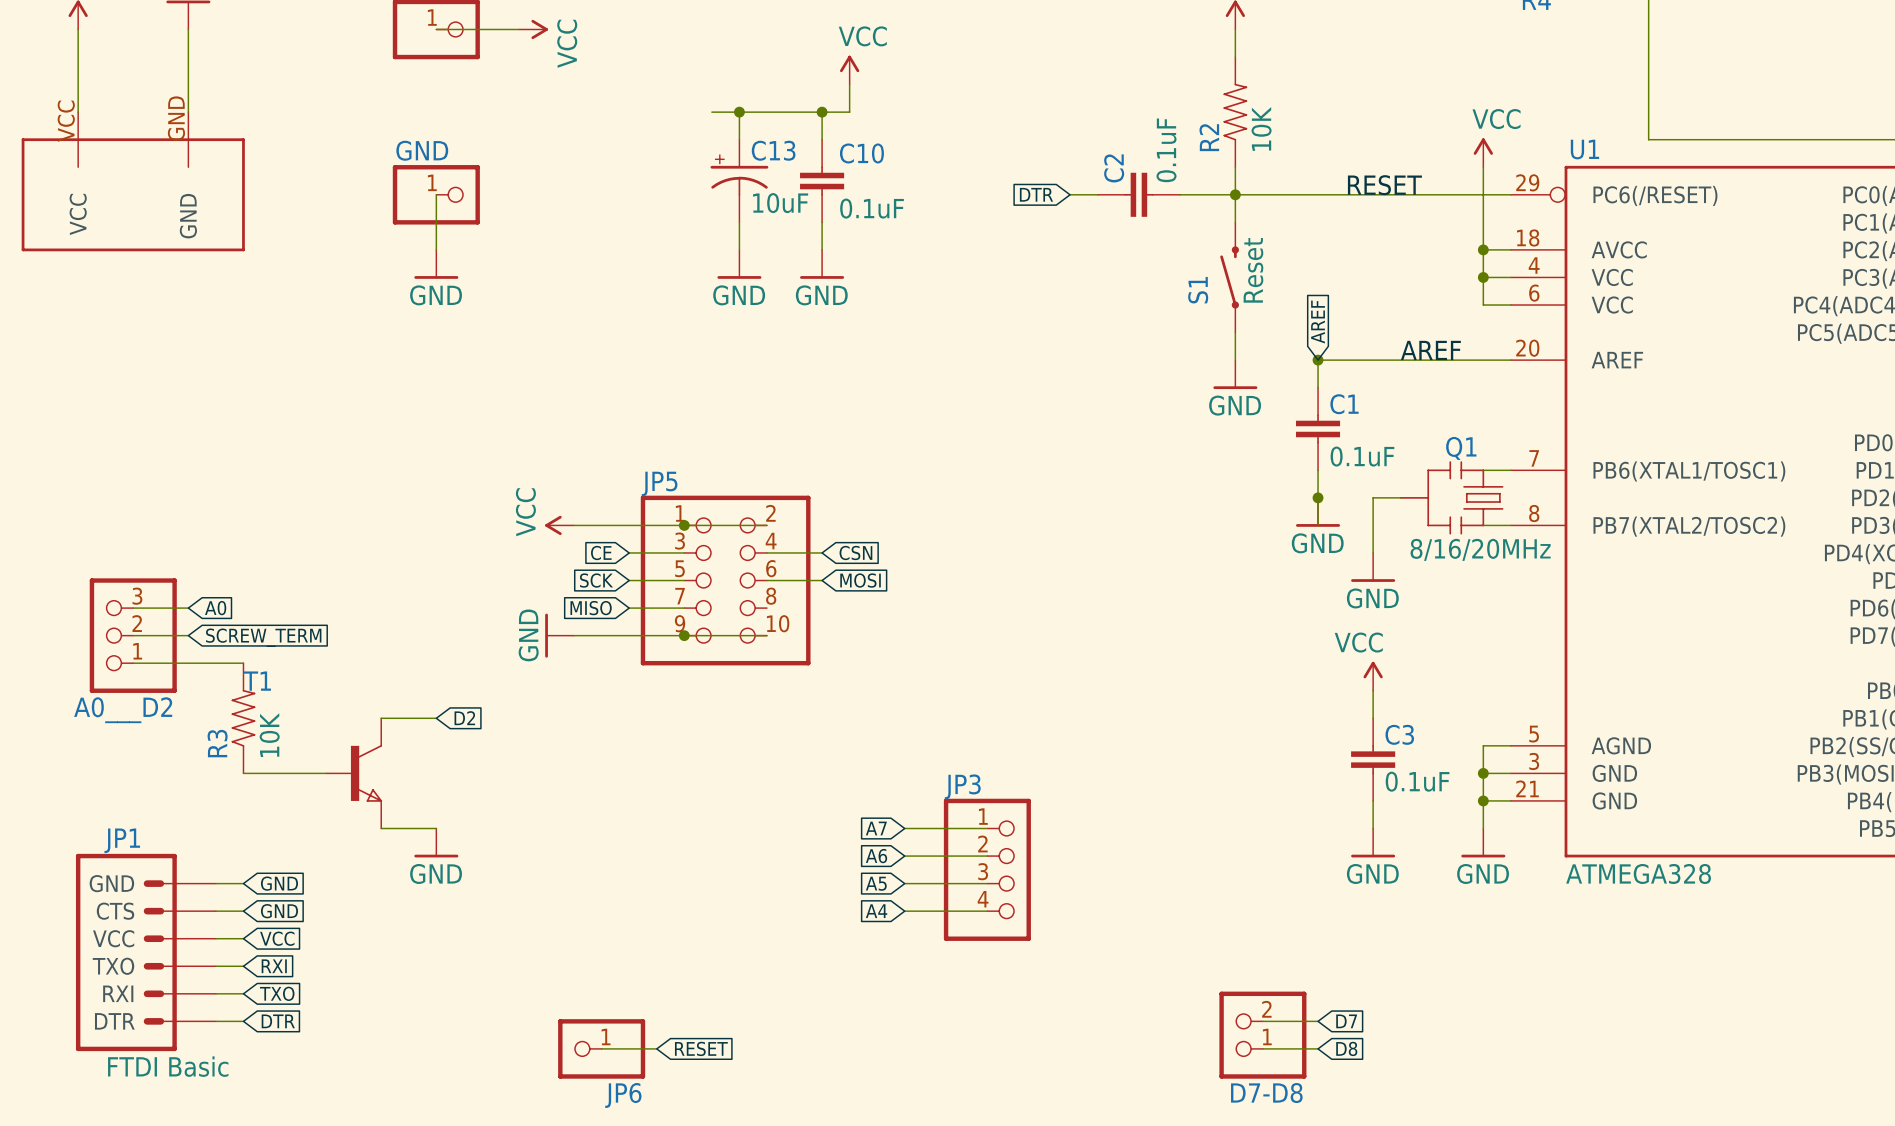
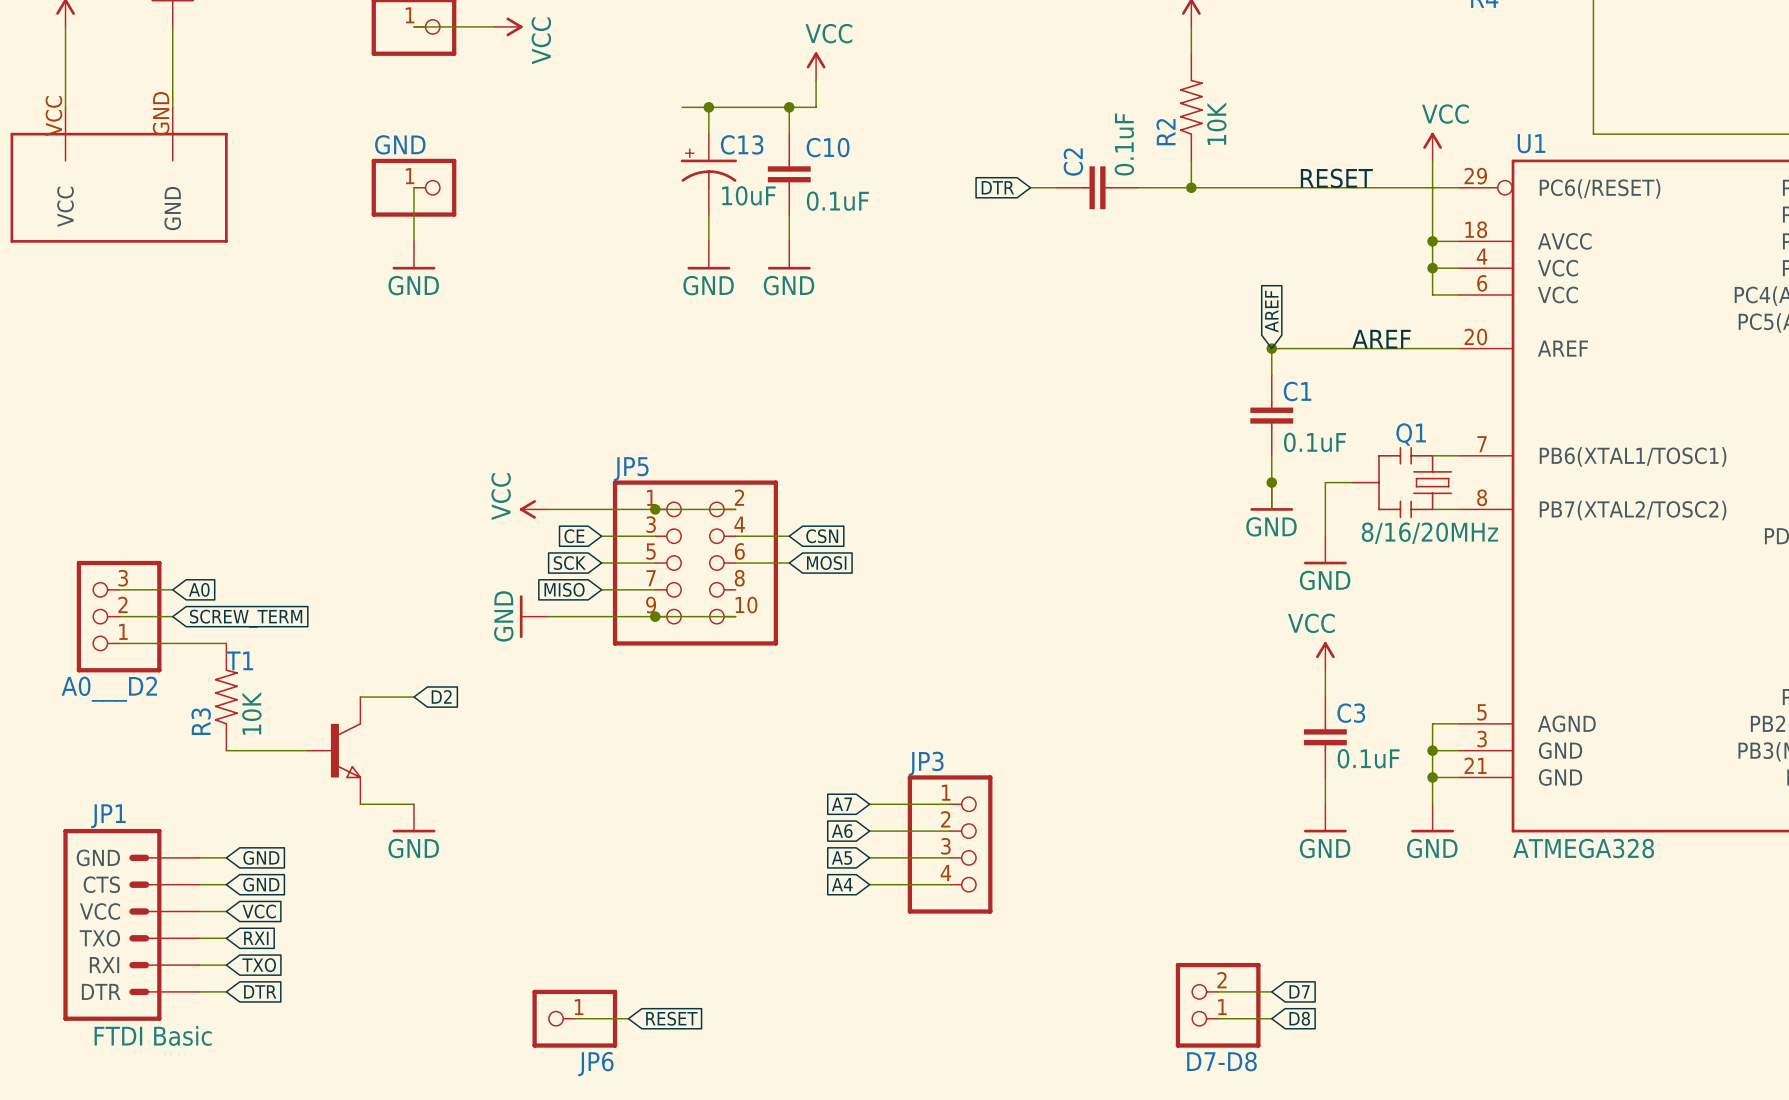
wire: (1235, 194) (1235, 222) -> none
S1: Reset (1229, 277) -> none
wire: (1235, 332) (1235, 360) -> none
power symbol: GND (1235, 374) -> none

